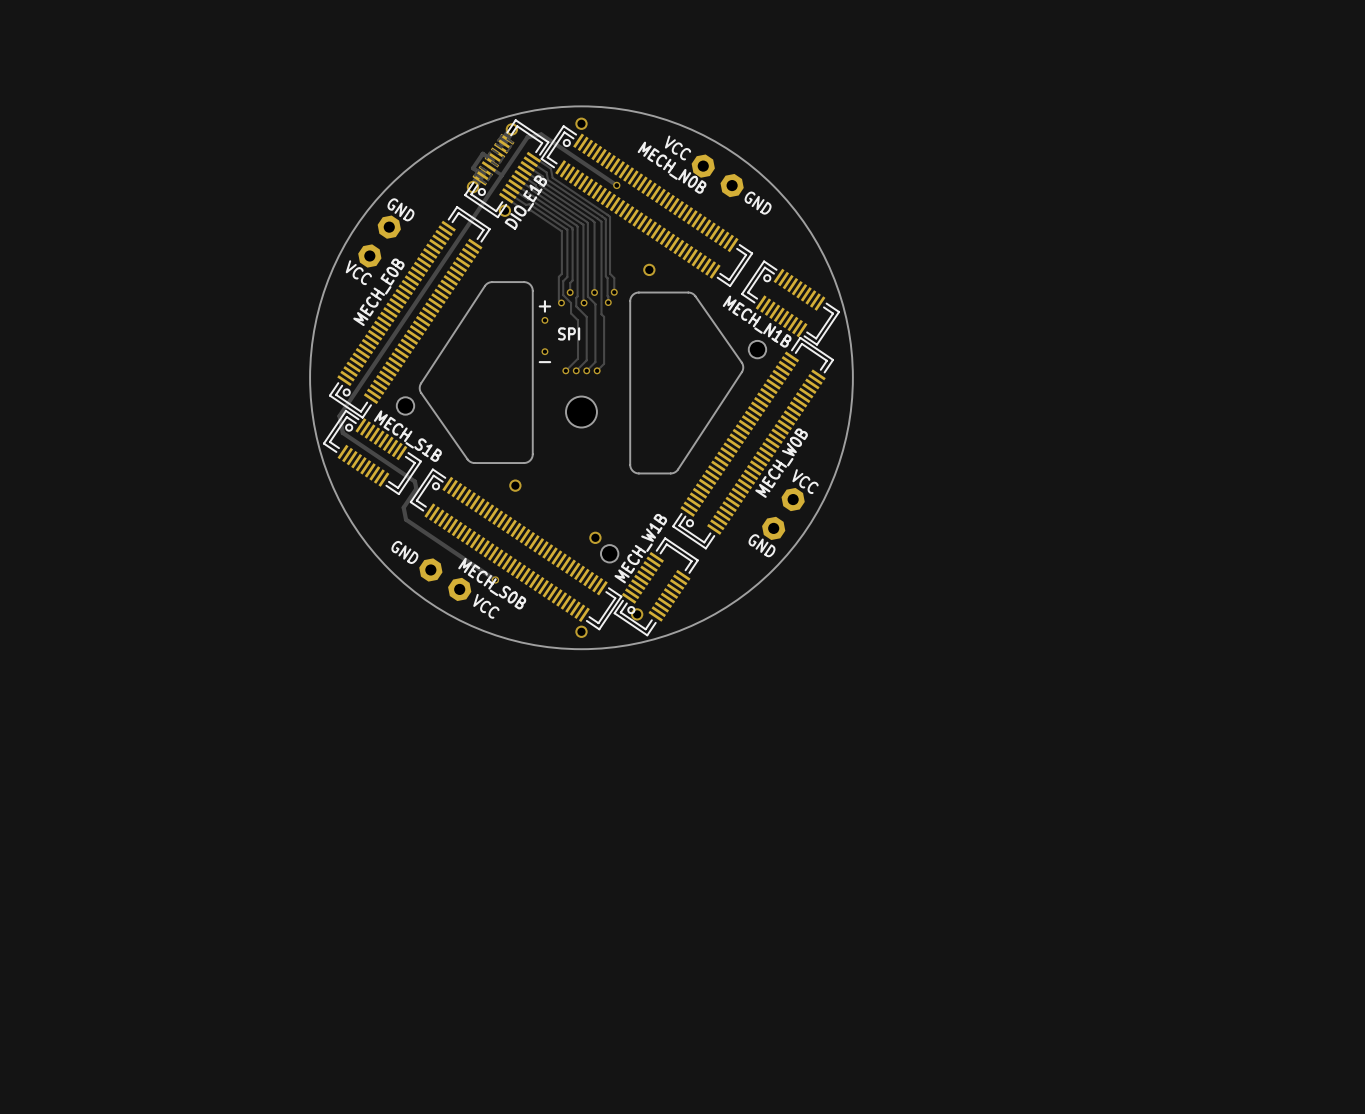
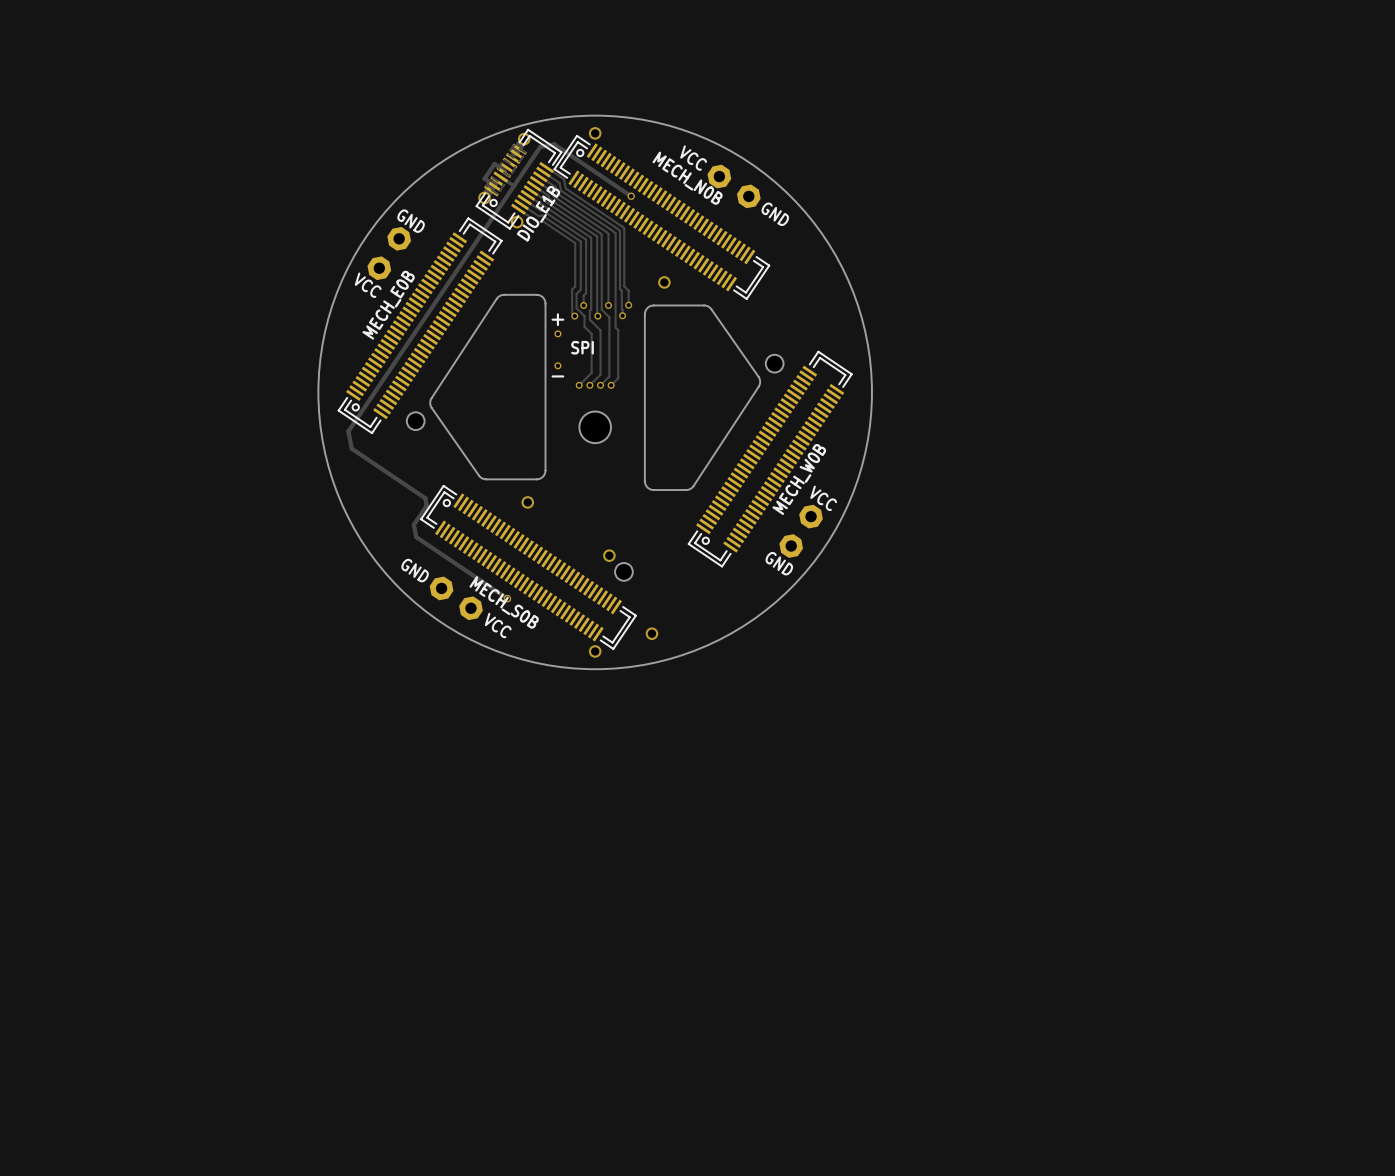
MECH_N1B: (790, 303) -> none
MECH_S1B: (372, 452) -> none
MECH_W1B: (656, 586) -> none

